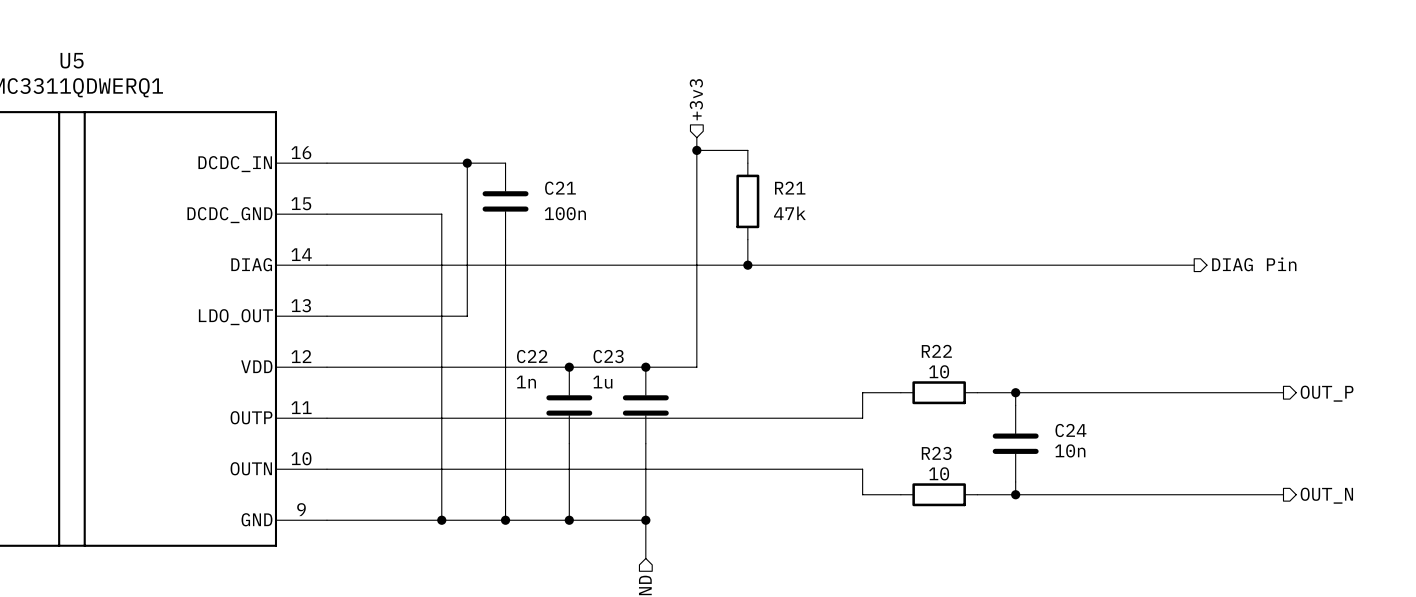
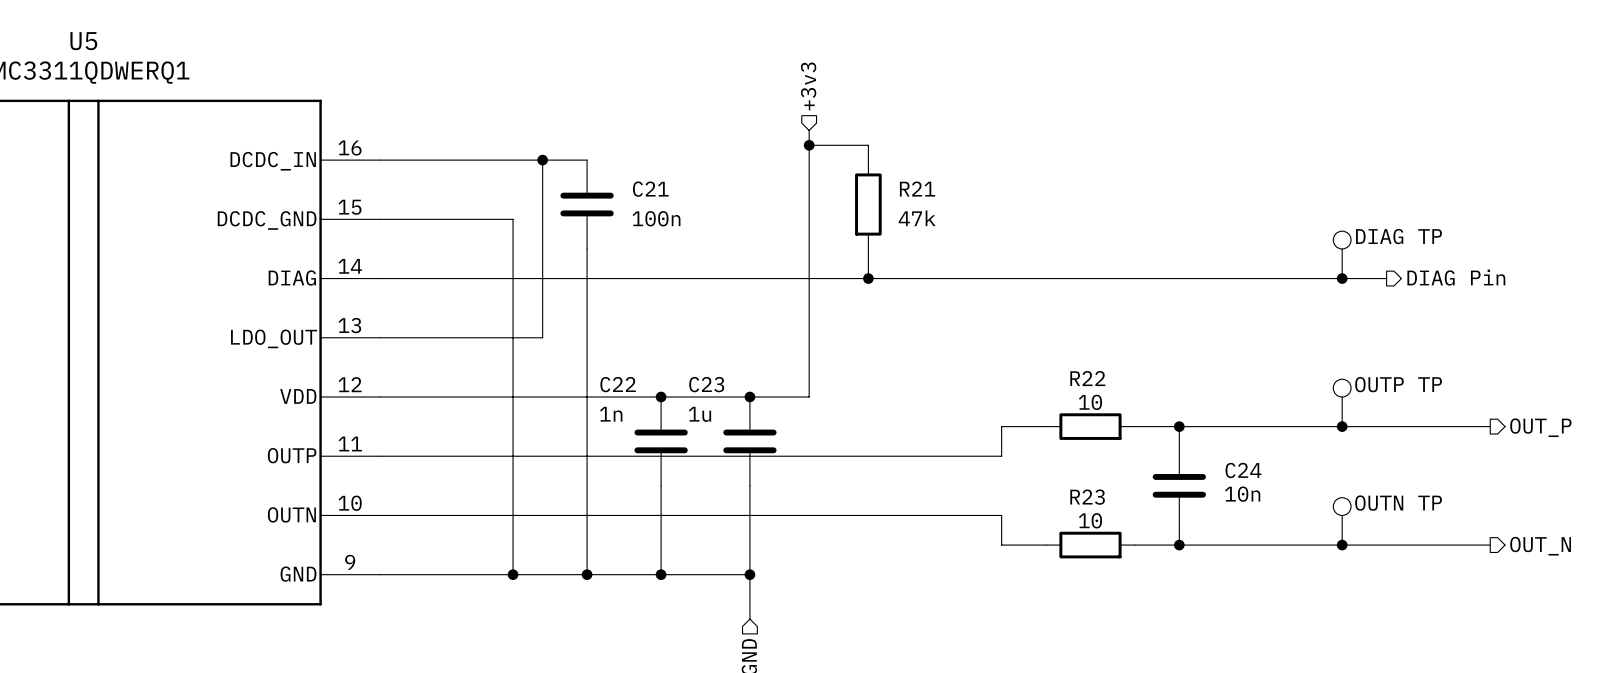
part: none -> DIAG TP (1342, 254)
junction: none -> (1342, 278)
part: none -> OUTP TP (1342, 402)
junction: none -> (1342, 426)
part: none -> OUTN TP (1342, 521)
junction: none -> (1342, 545)

